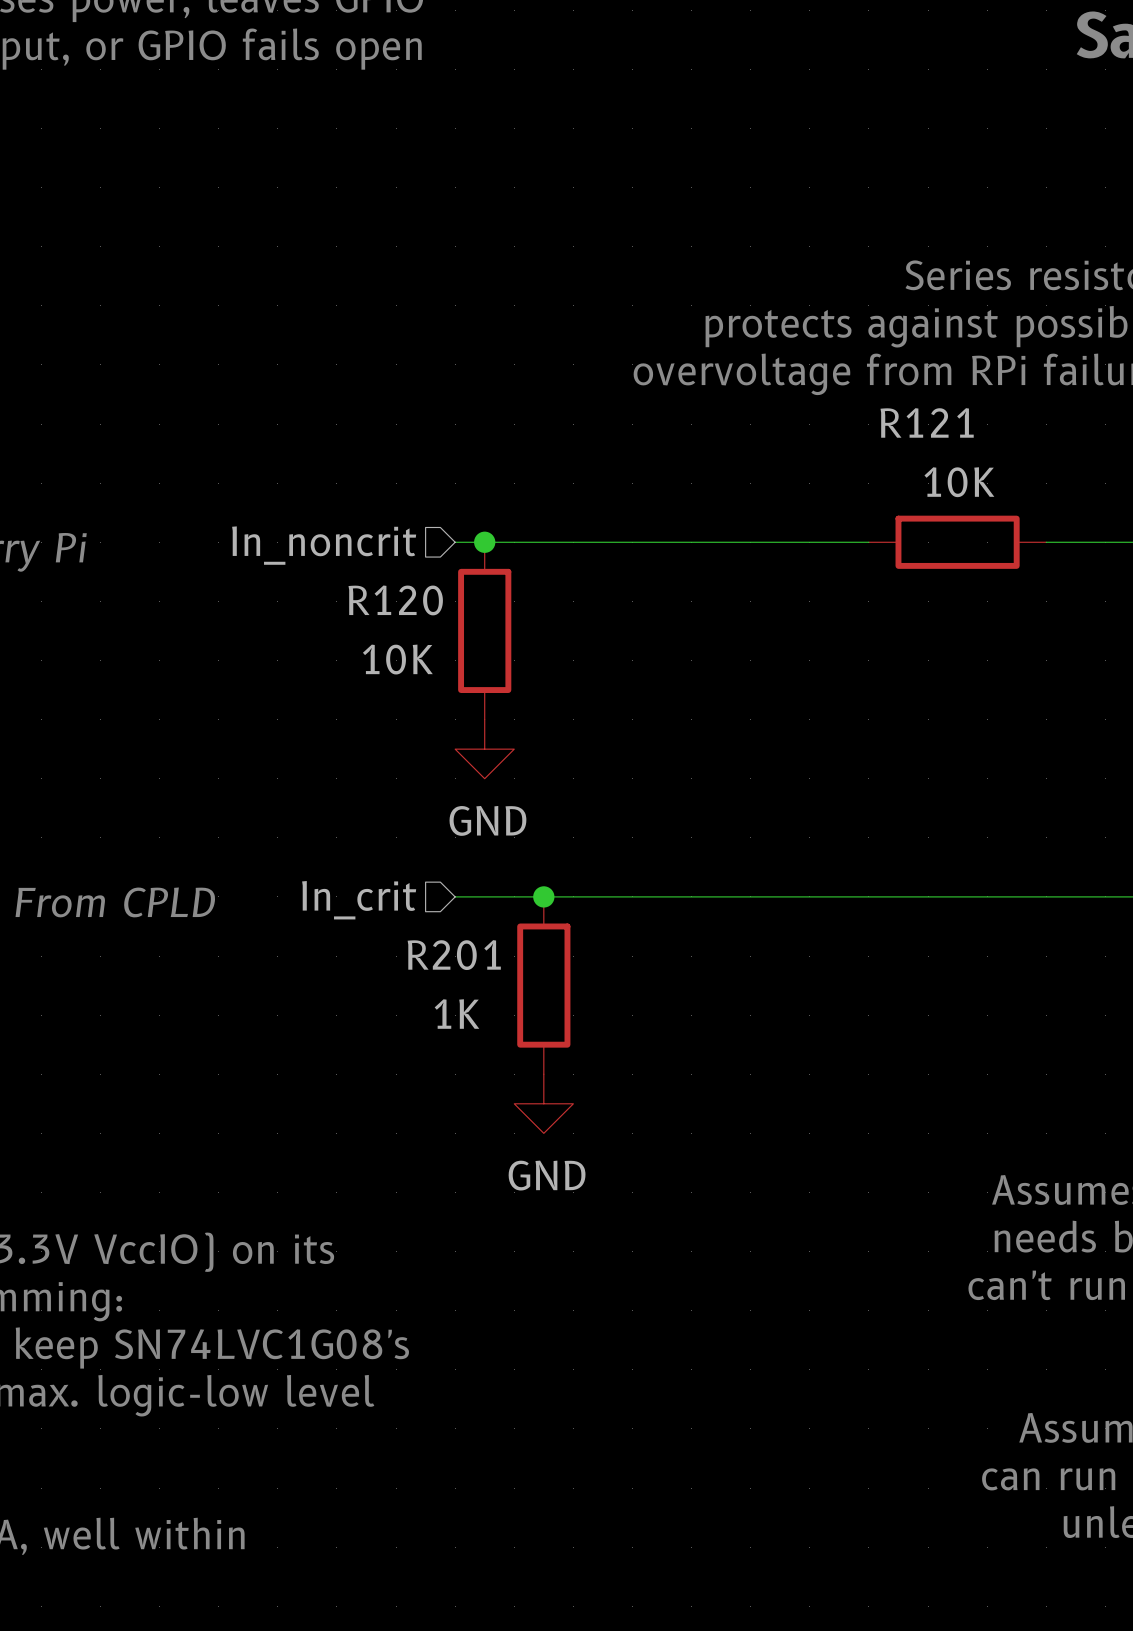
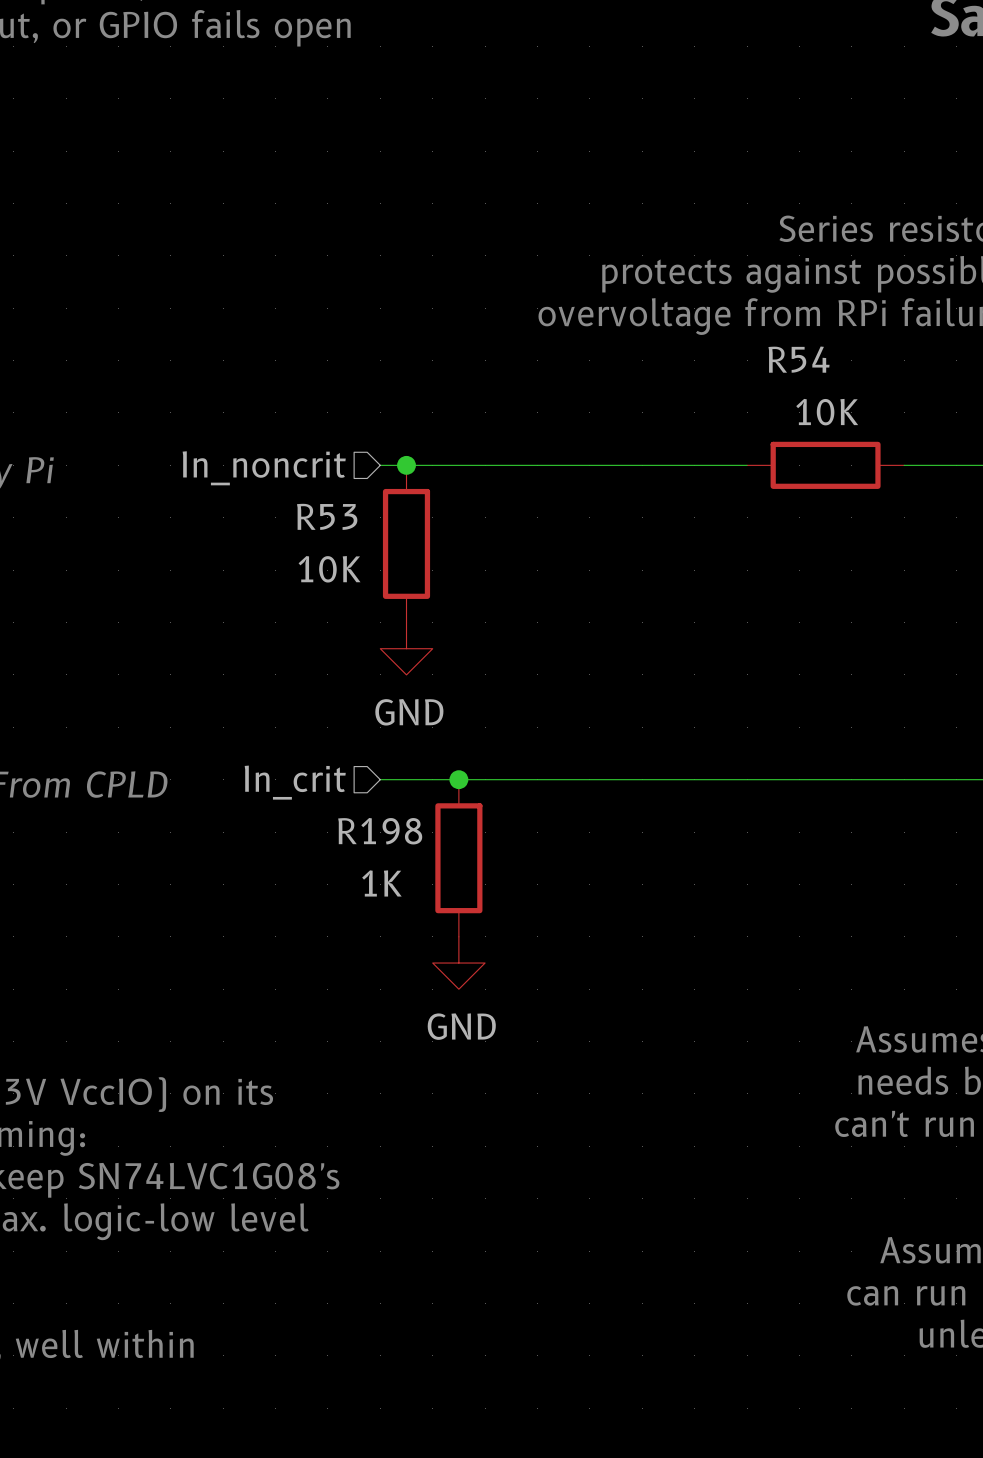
R121 name: R121 (927, 422) -> R54 (799, 359)
R120 name: R120 (395, 600) -> R53 (327, 516)
R201 name: R201 (454, 955) -> R198 (380, 831)

